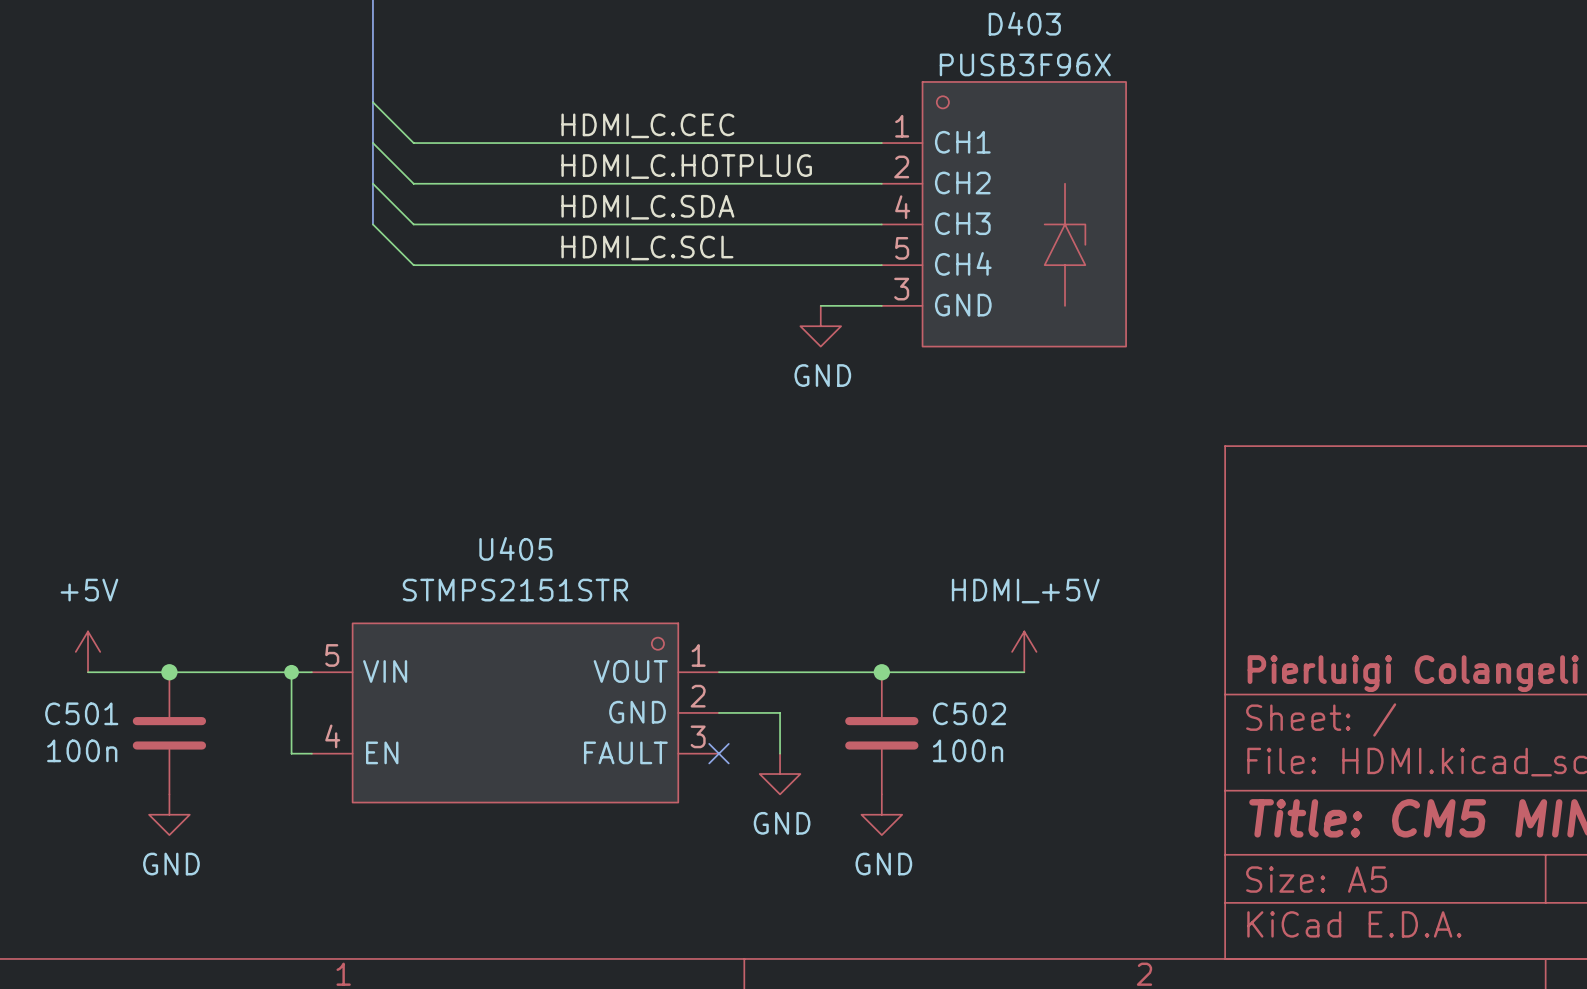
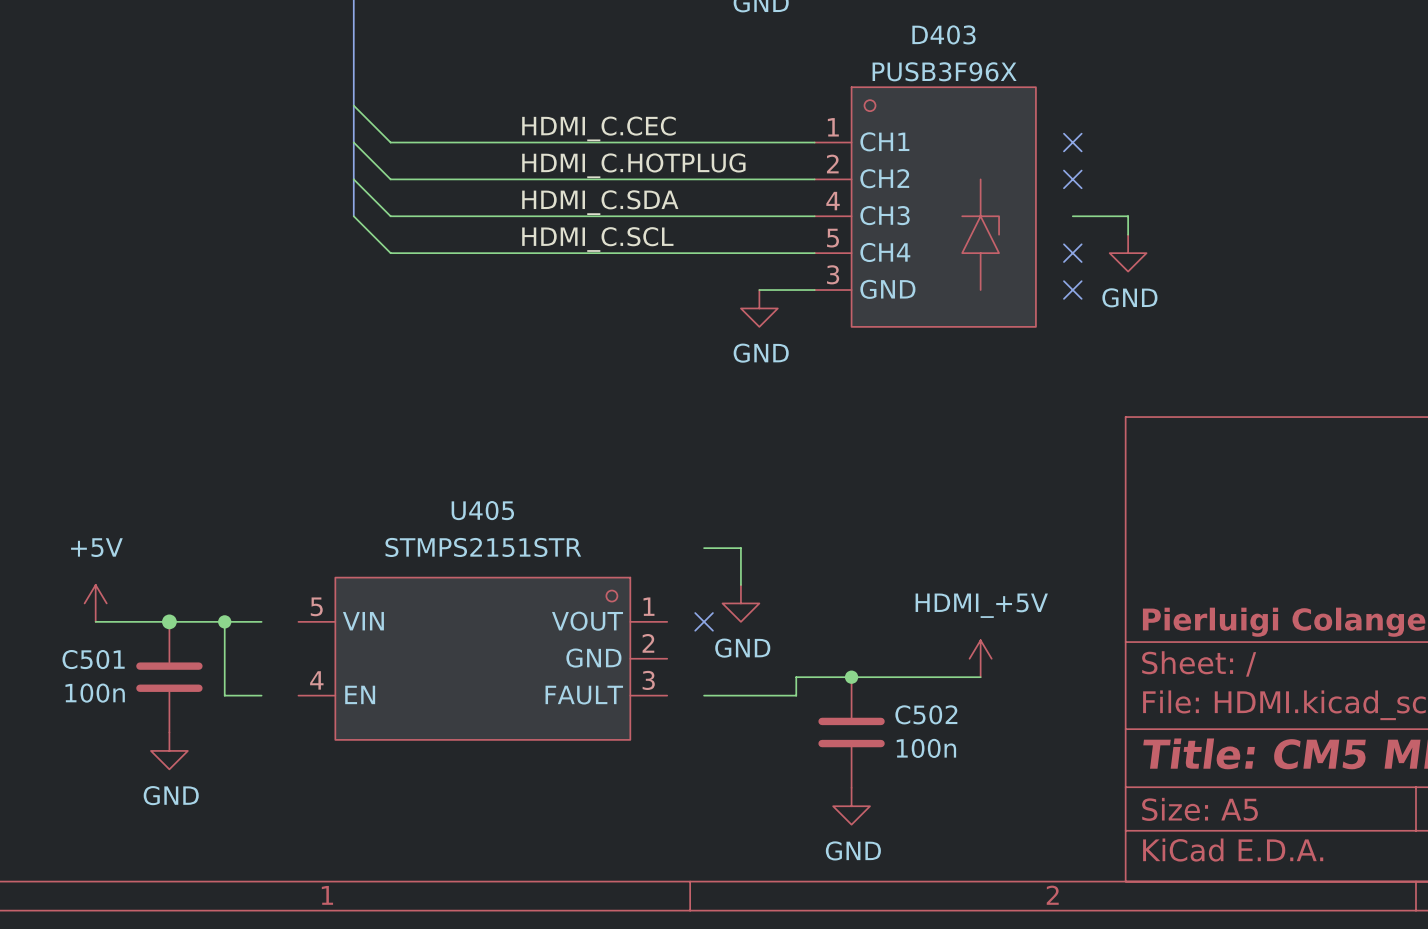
no-connect mark: none -> (1072, 142)
no-connect mark: none -> (1072, 179)
wire: none -> (1072, 216) (1128, 216) (1128, 234)
no-connect mark: none -> (1072, 253)
power symbol: none -> GND (1128, 253)
no-connect mark: none -> (1072, 290)
wire: none -> (704, 548) (740, 548) (740, 585)
power symbol: none -> GND (740, 603)
power symbol position: HDMI_+5V (1024, 651) -> HDMI_+5V (980, 658)
wire: none -> (224, 621) (224, 695) (261, 695)
wire: (271, 672) (311, 672) -> none
wire: (291, 672) (291, 753) (311, 753) -> none
junction position: (291, 672) -> (224, 621)
wire: (718, 672) (1024, 672) -> none
junction: (881, 672) -> none
wire: (718, 712) (780, 712) (780, 753) -> none
C502 position: (881, 733) -> (851, 732)
junction: none -> (851, 677)
wire: none -> (980, 677) (796, 677) (796, 695) (704, 695)
no-connect mark position: (718, 753) -> (704, 621)
power symbol: GND (780, 774) -> none
power symbol position: GND (881, 814) -> GND (851, 806)

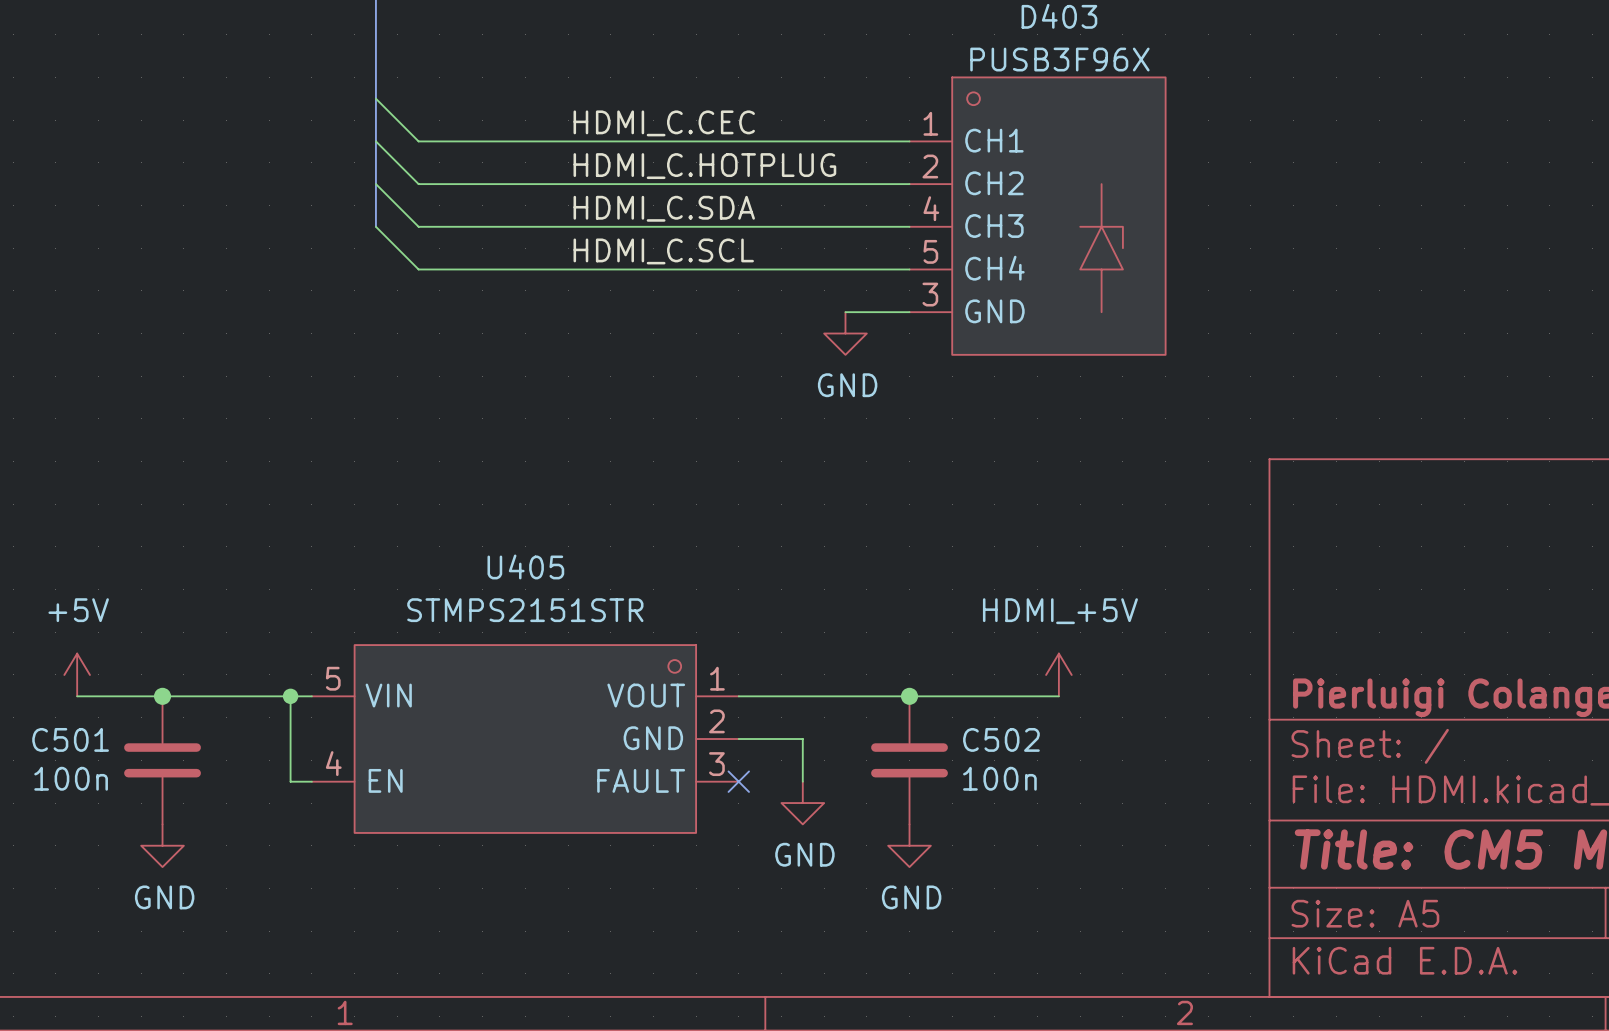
no-connect mark: (1072, 142) -> none
no-connect mark: (1072, 179) -> none
wire: (1072, 216) (1128, 216) (1128, 234) -> none
no-connect mark: (1072, 253) -> none
power symbol: GND (1128, 253) -> none
no-connect mark: (1072, 290) -> none
wire: (704, 548) (740, 548) (740, 585) -> none
power symbol: GND (740, 603) -> none
wire: (224, 621) (224, 695) (261, 695) -> none
junction position: (224, 621) -> (290, 696)
wire: none -> (269, 696) (311, 696)
wire: none -> (290, 696) (290, 781) (311, 781)
wire: none -> (738, 696) (1058, 696)
no-connect mark position: (704, 621) -> (738, 781)
junction: none -> (909, 696)
wire: none -> (738, 739) (802, 739) (802, 781)
power symbol position: HDMI_+5V (980, 658) -> HDMI_+5V (1058, 674)
junction: (851, 677) -> none
wire: (980, 677) (796, 677) (796, 695) (704, 695) -> none
power symbol: none -> GND (802, 803)
C502 position: (851, 732) -> (909, 760)
power symbol position: GND (851, 806) -> GND (909, 845)

